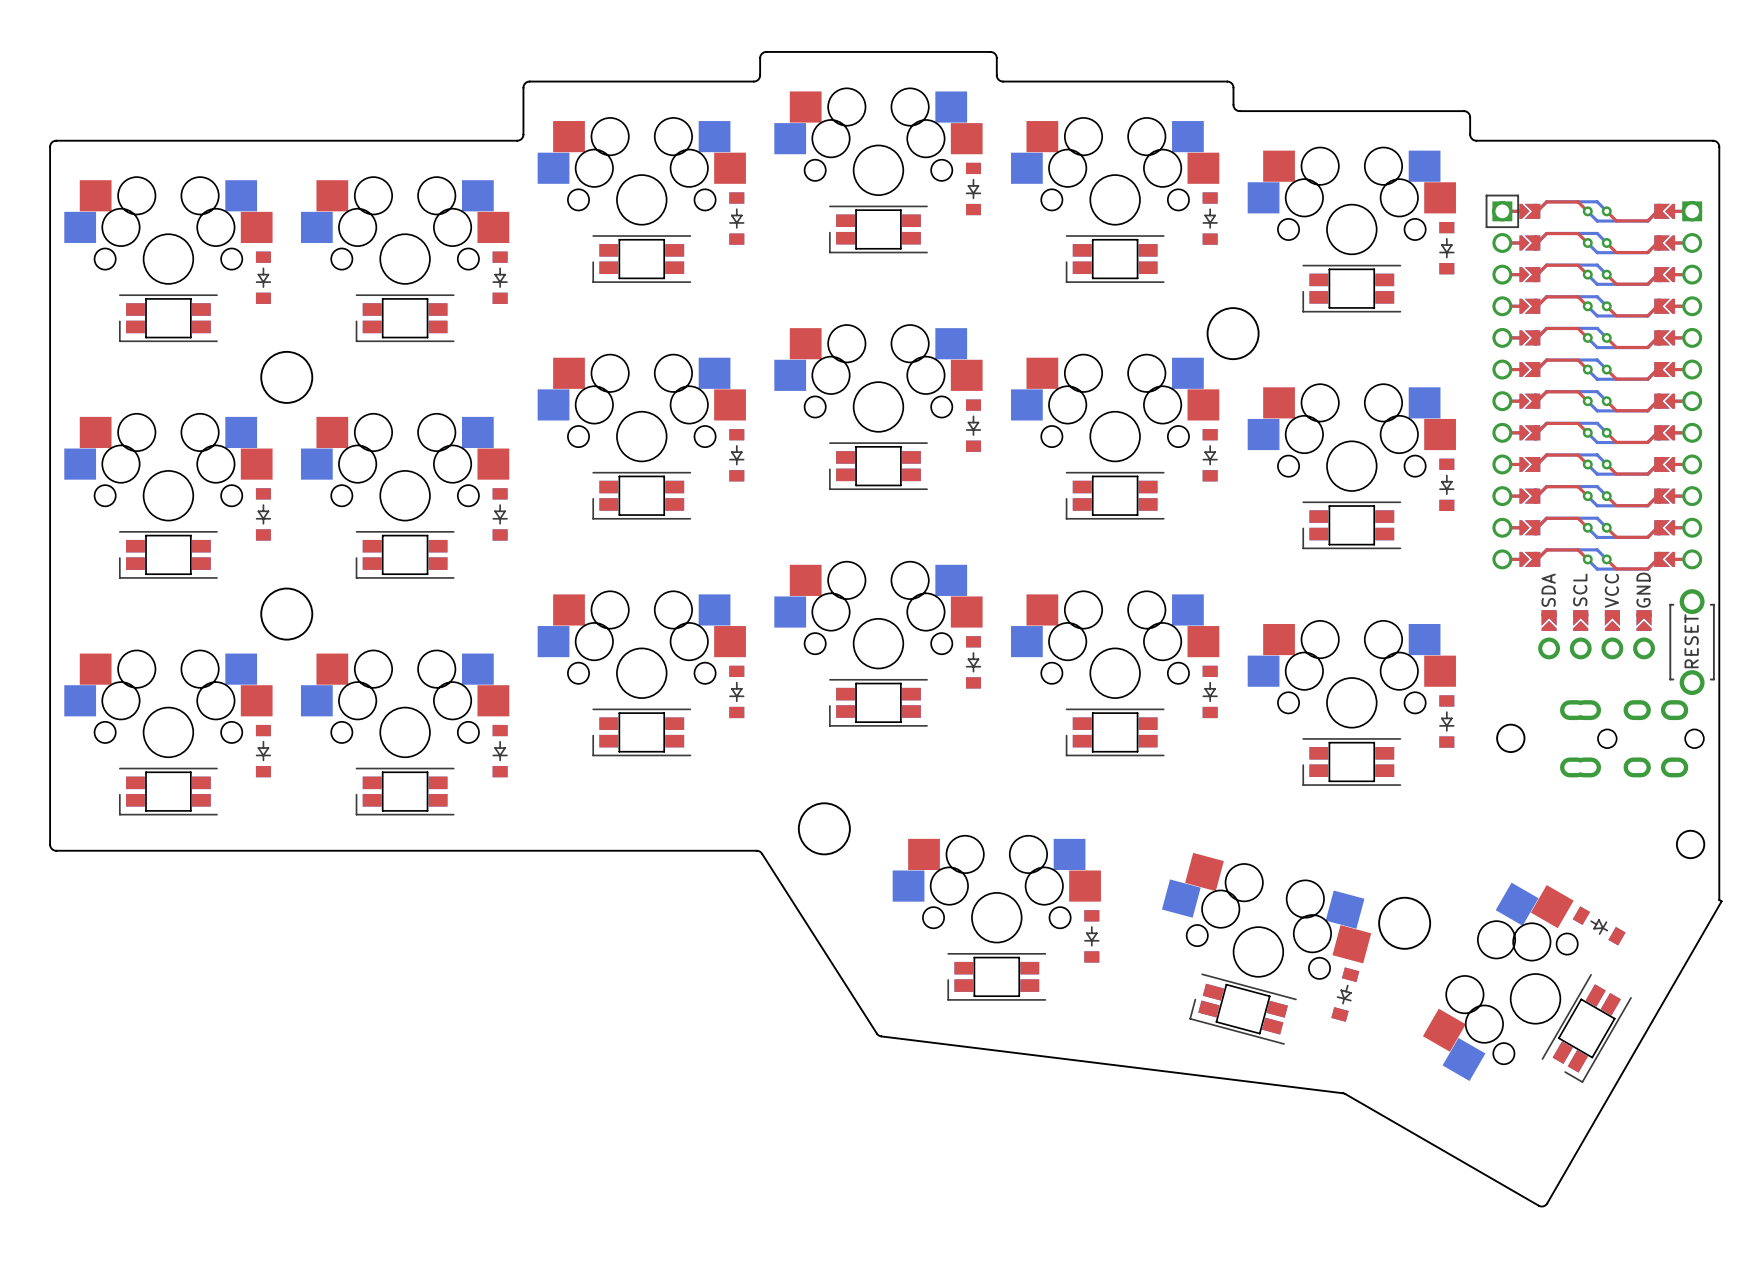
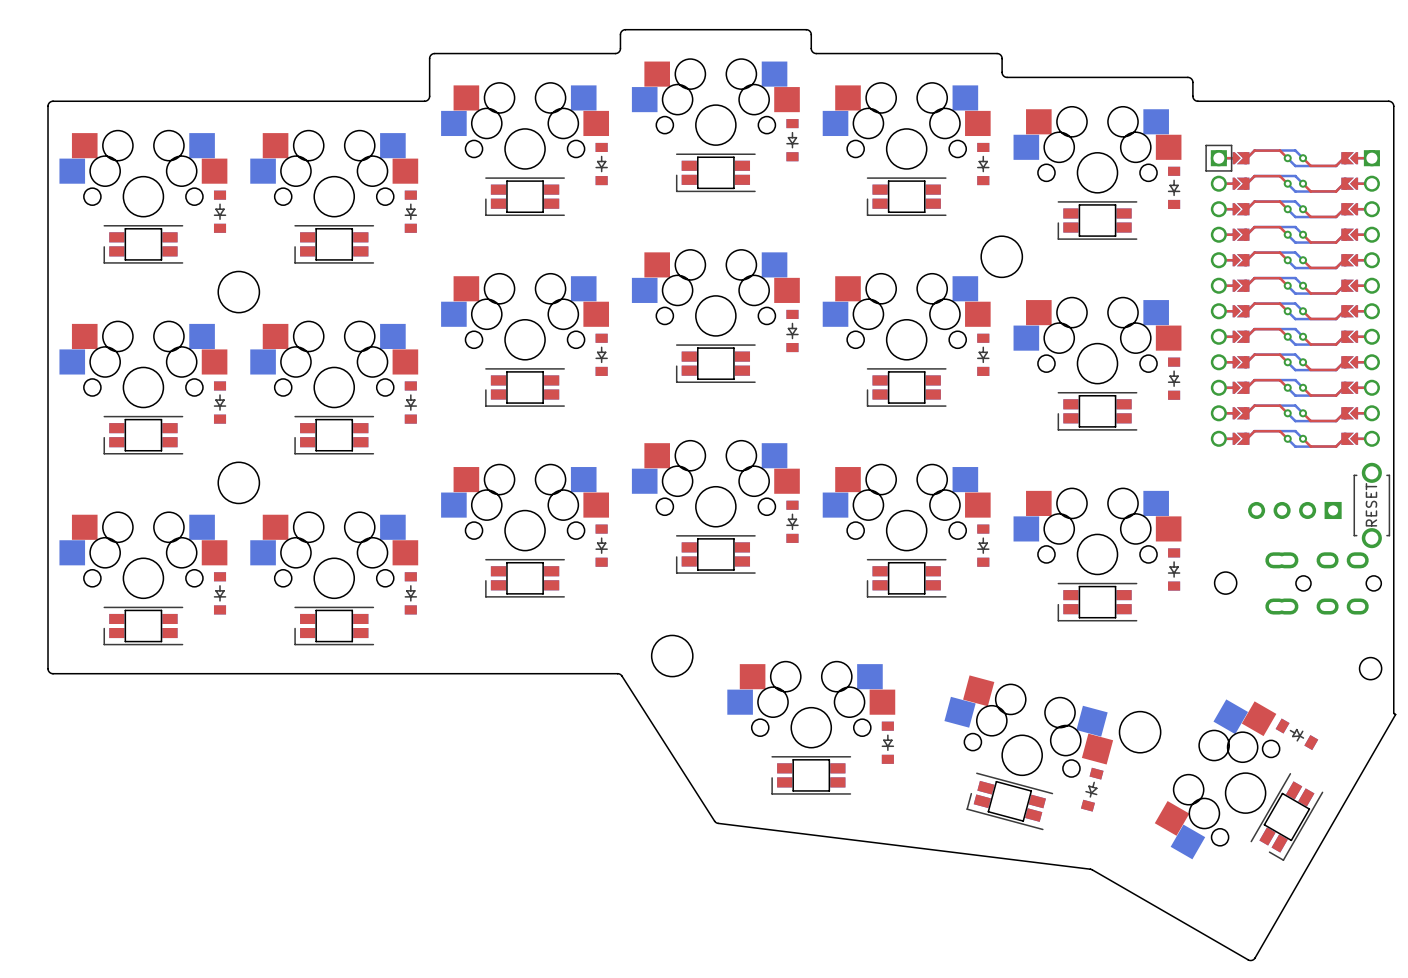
part: (1596, 634) -> none
part: none -> (1294, 510)

